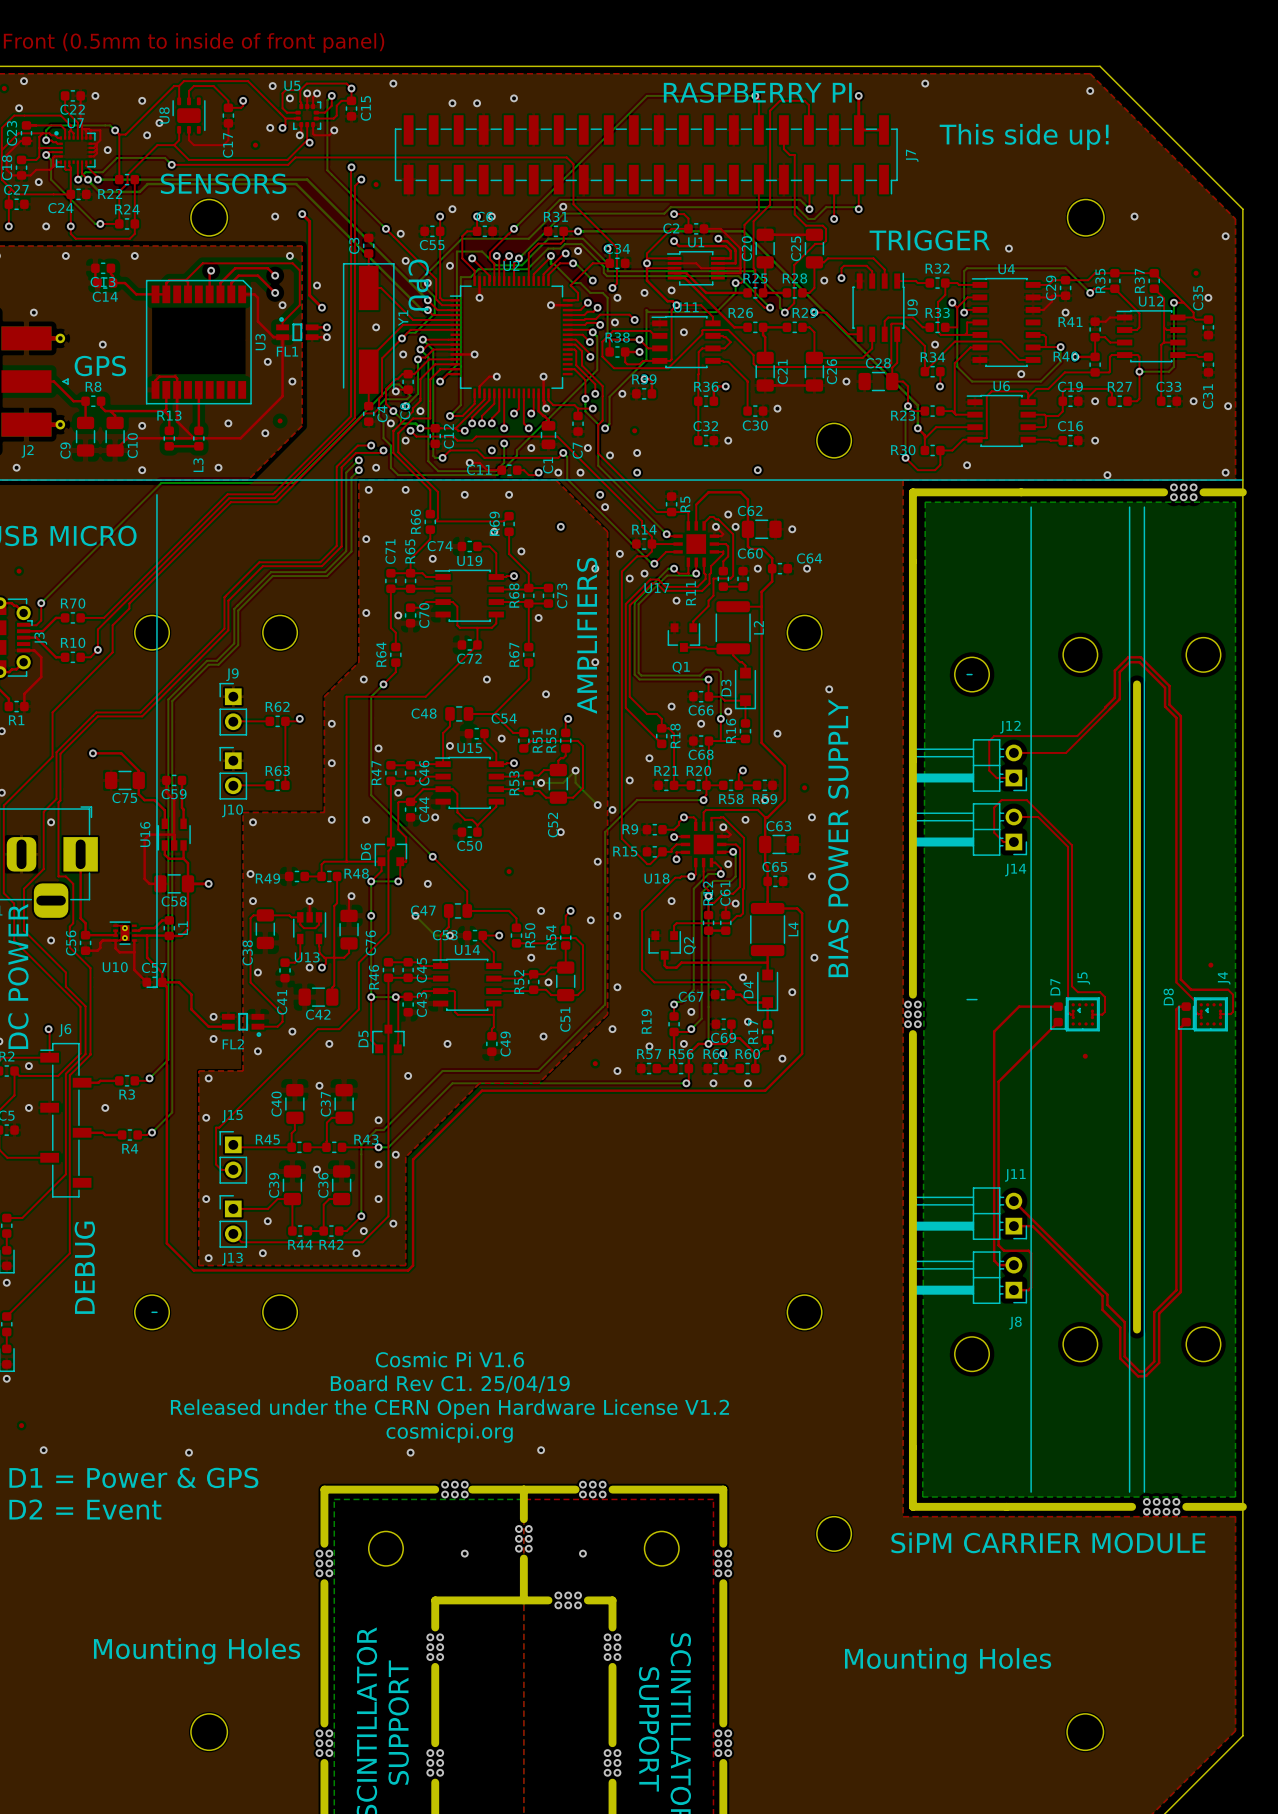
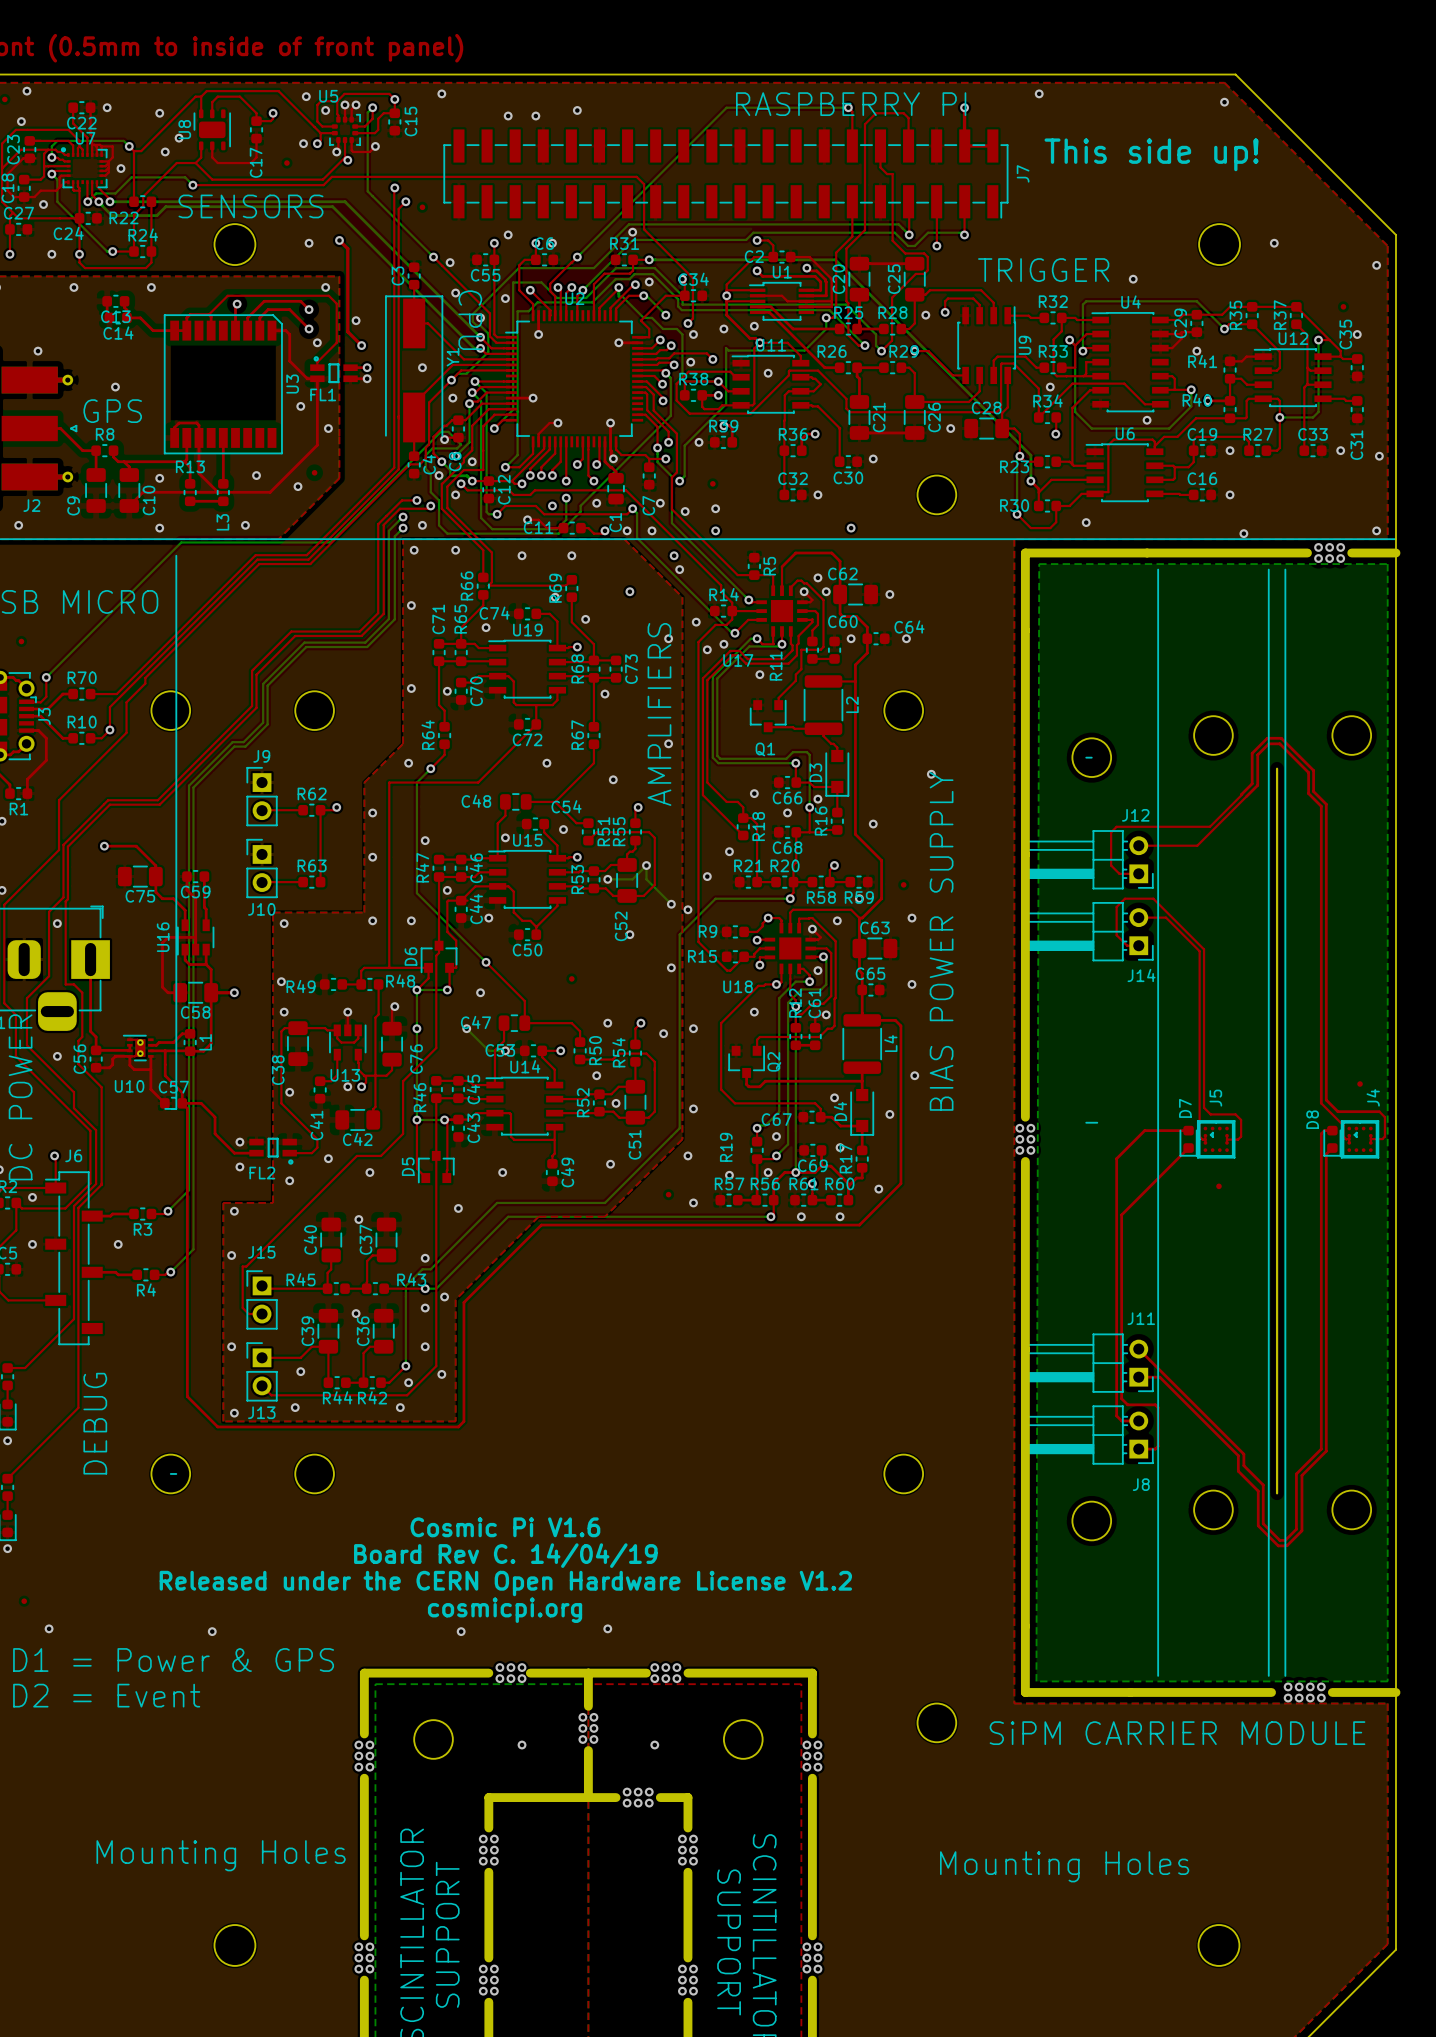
board edge width: thick (1137, 684) (1137, 1329) -> thin (1277, 768) (1277, 1493)
text: Board Rev C1. 25/04/19 (450, 1384) -> Board Rev C. 14/04/19 (505, 1555)

